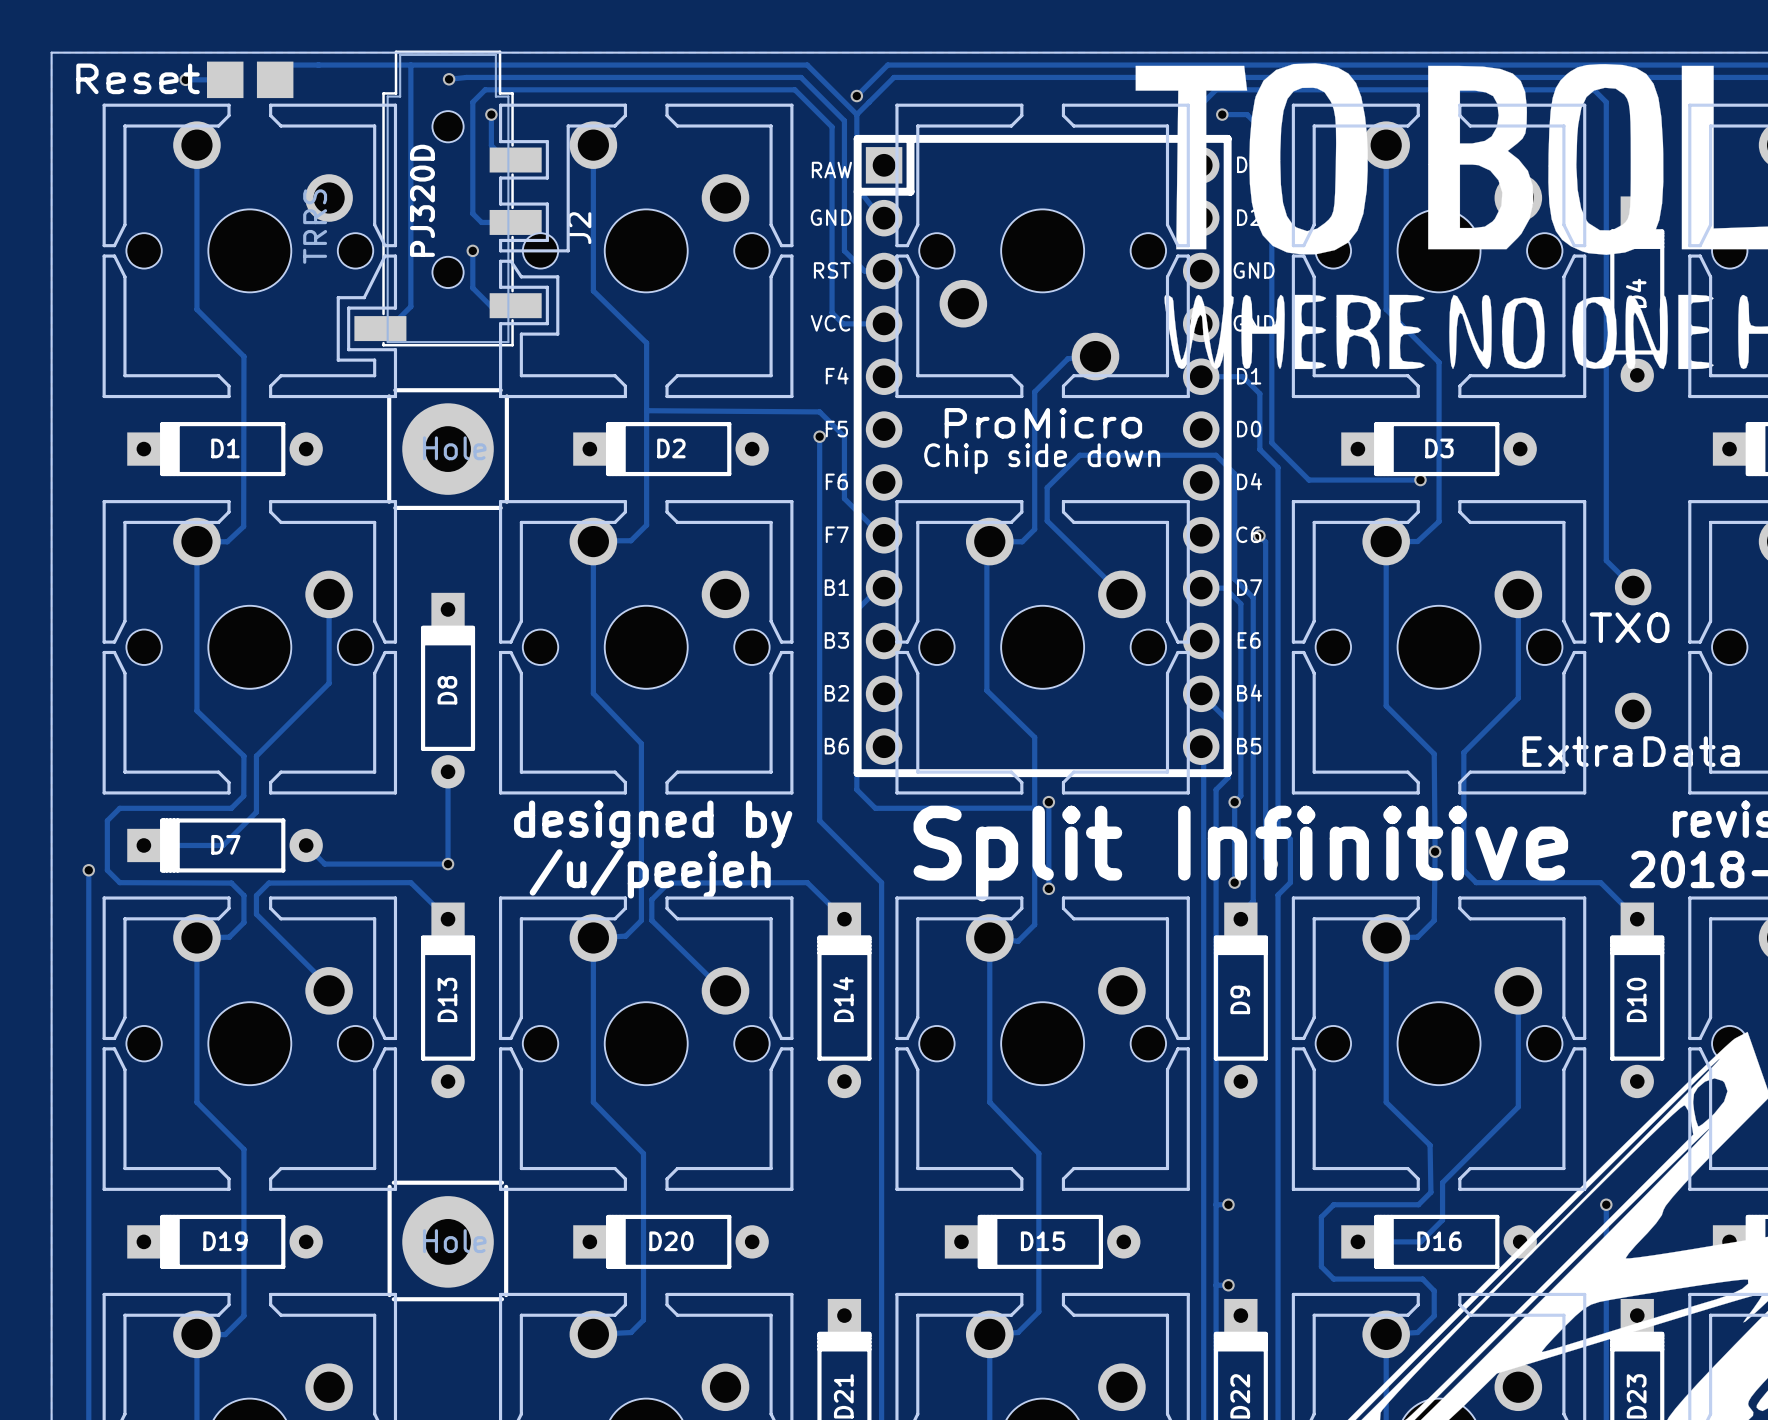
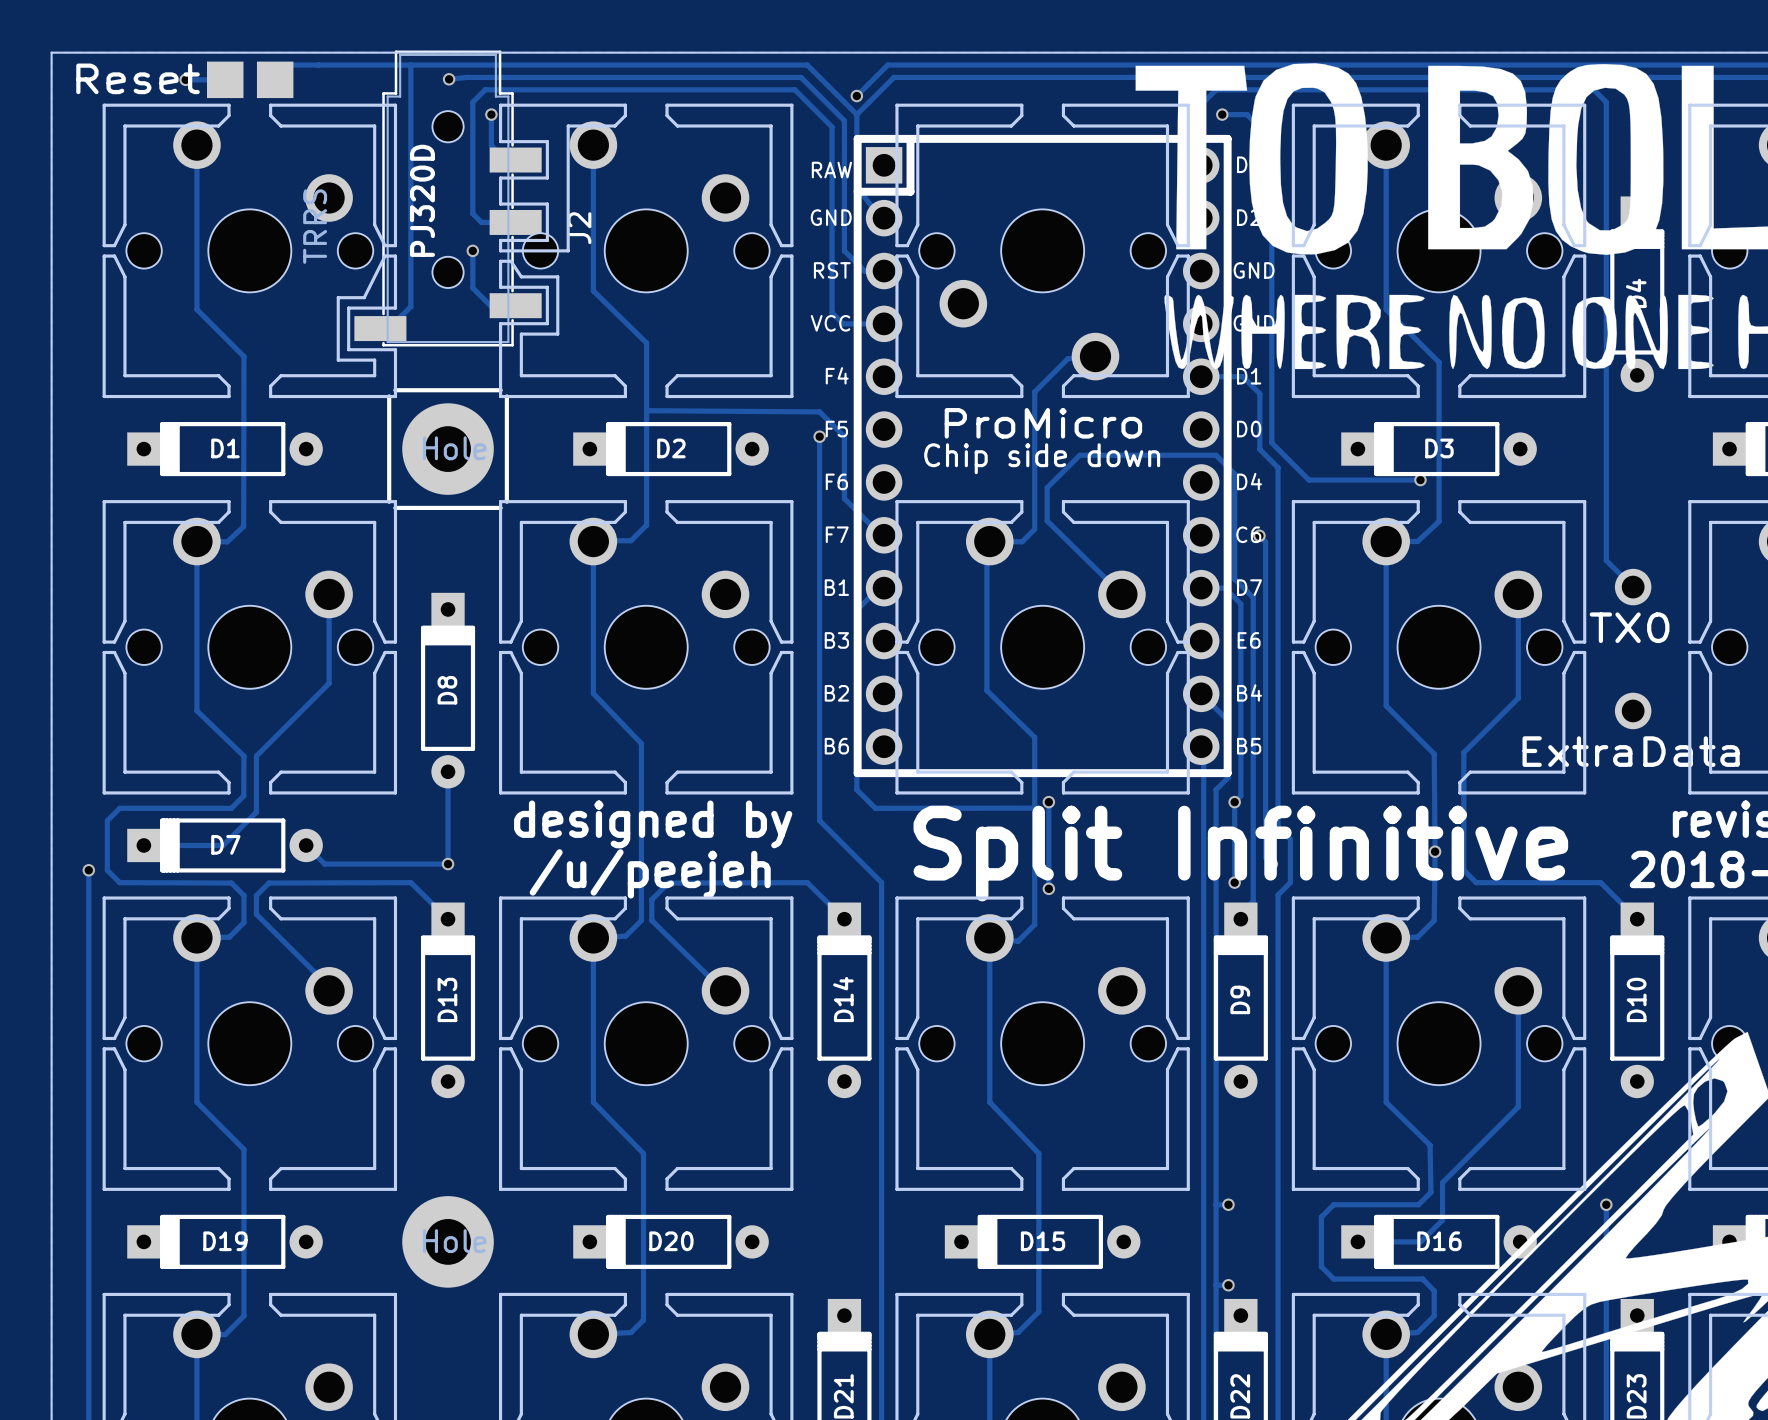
line: (393, 1182) (501, 1182) -> none
line: (389, 1186) (389, 1295) -> none
line: (506, 1186) (506, 1295) -> none
line: (393, 1299) (501, 1299) -> none

